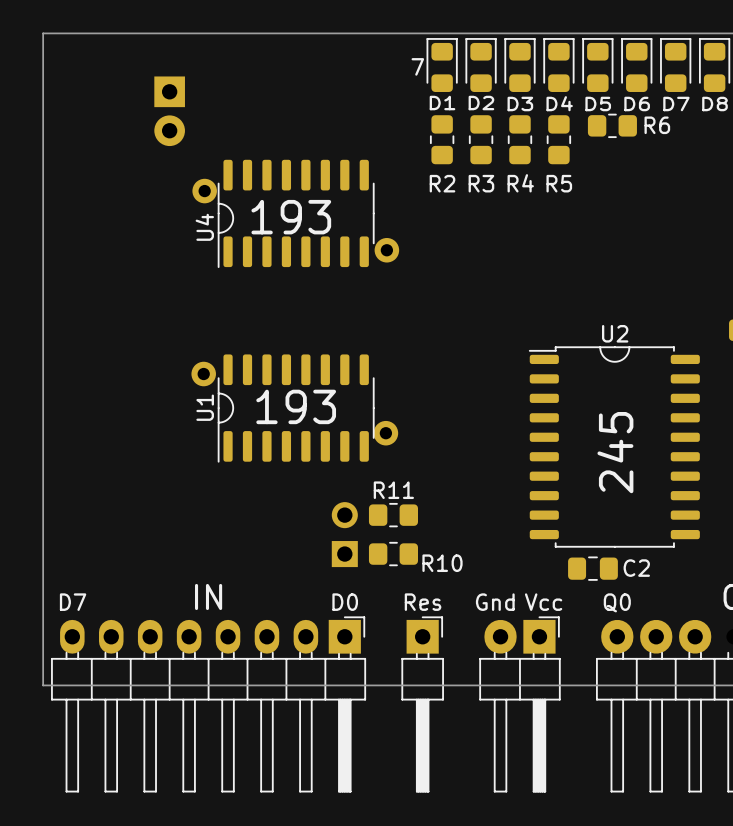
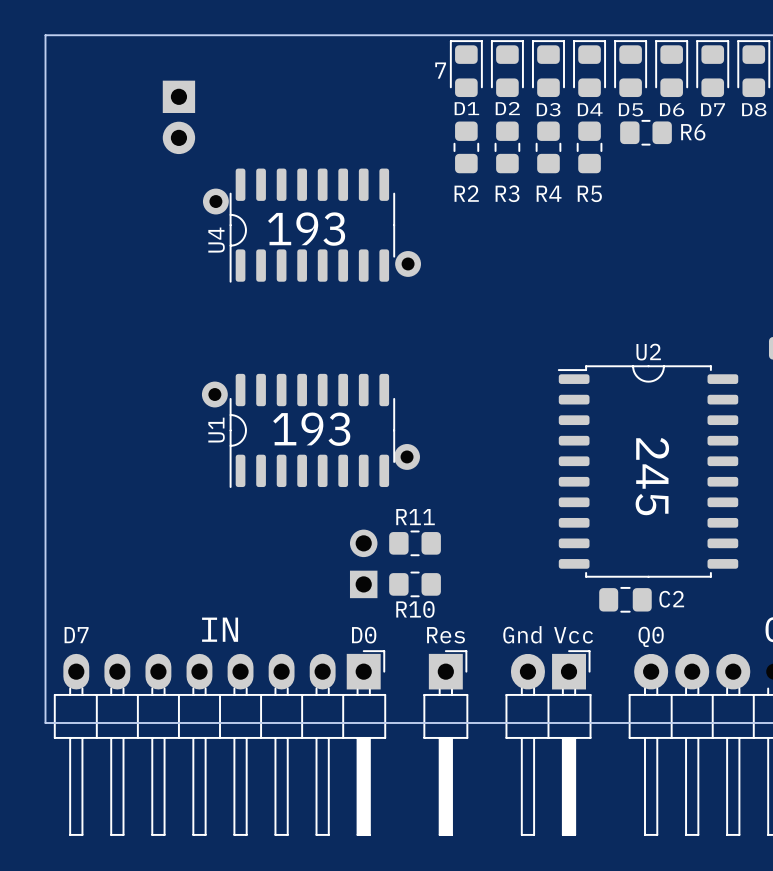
text rotation: 0° (615, 452) -> 180° (652, 476)
R10 name position: R10 (442, 563) -> R10 (415, 609)

